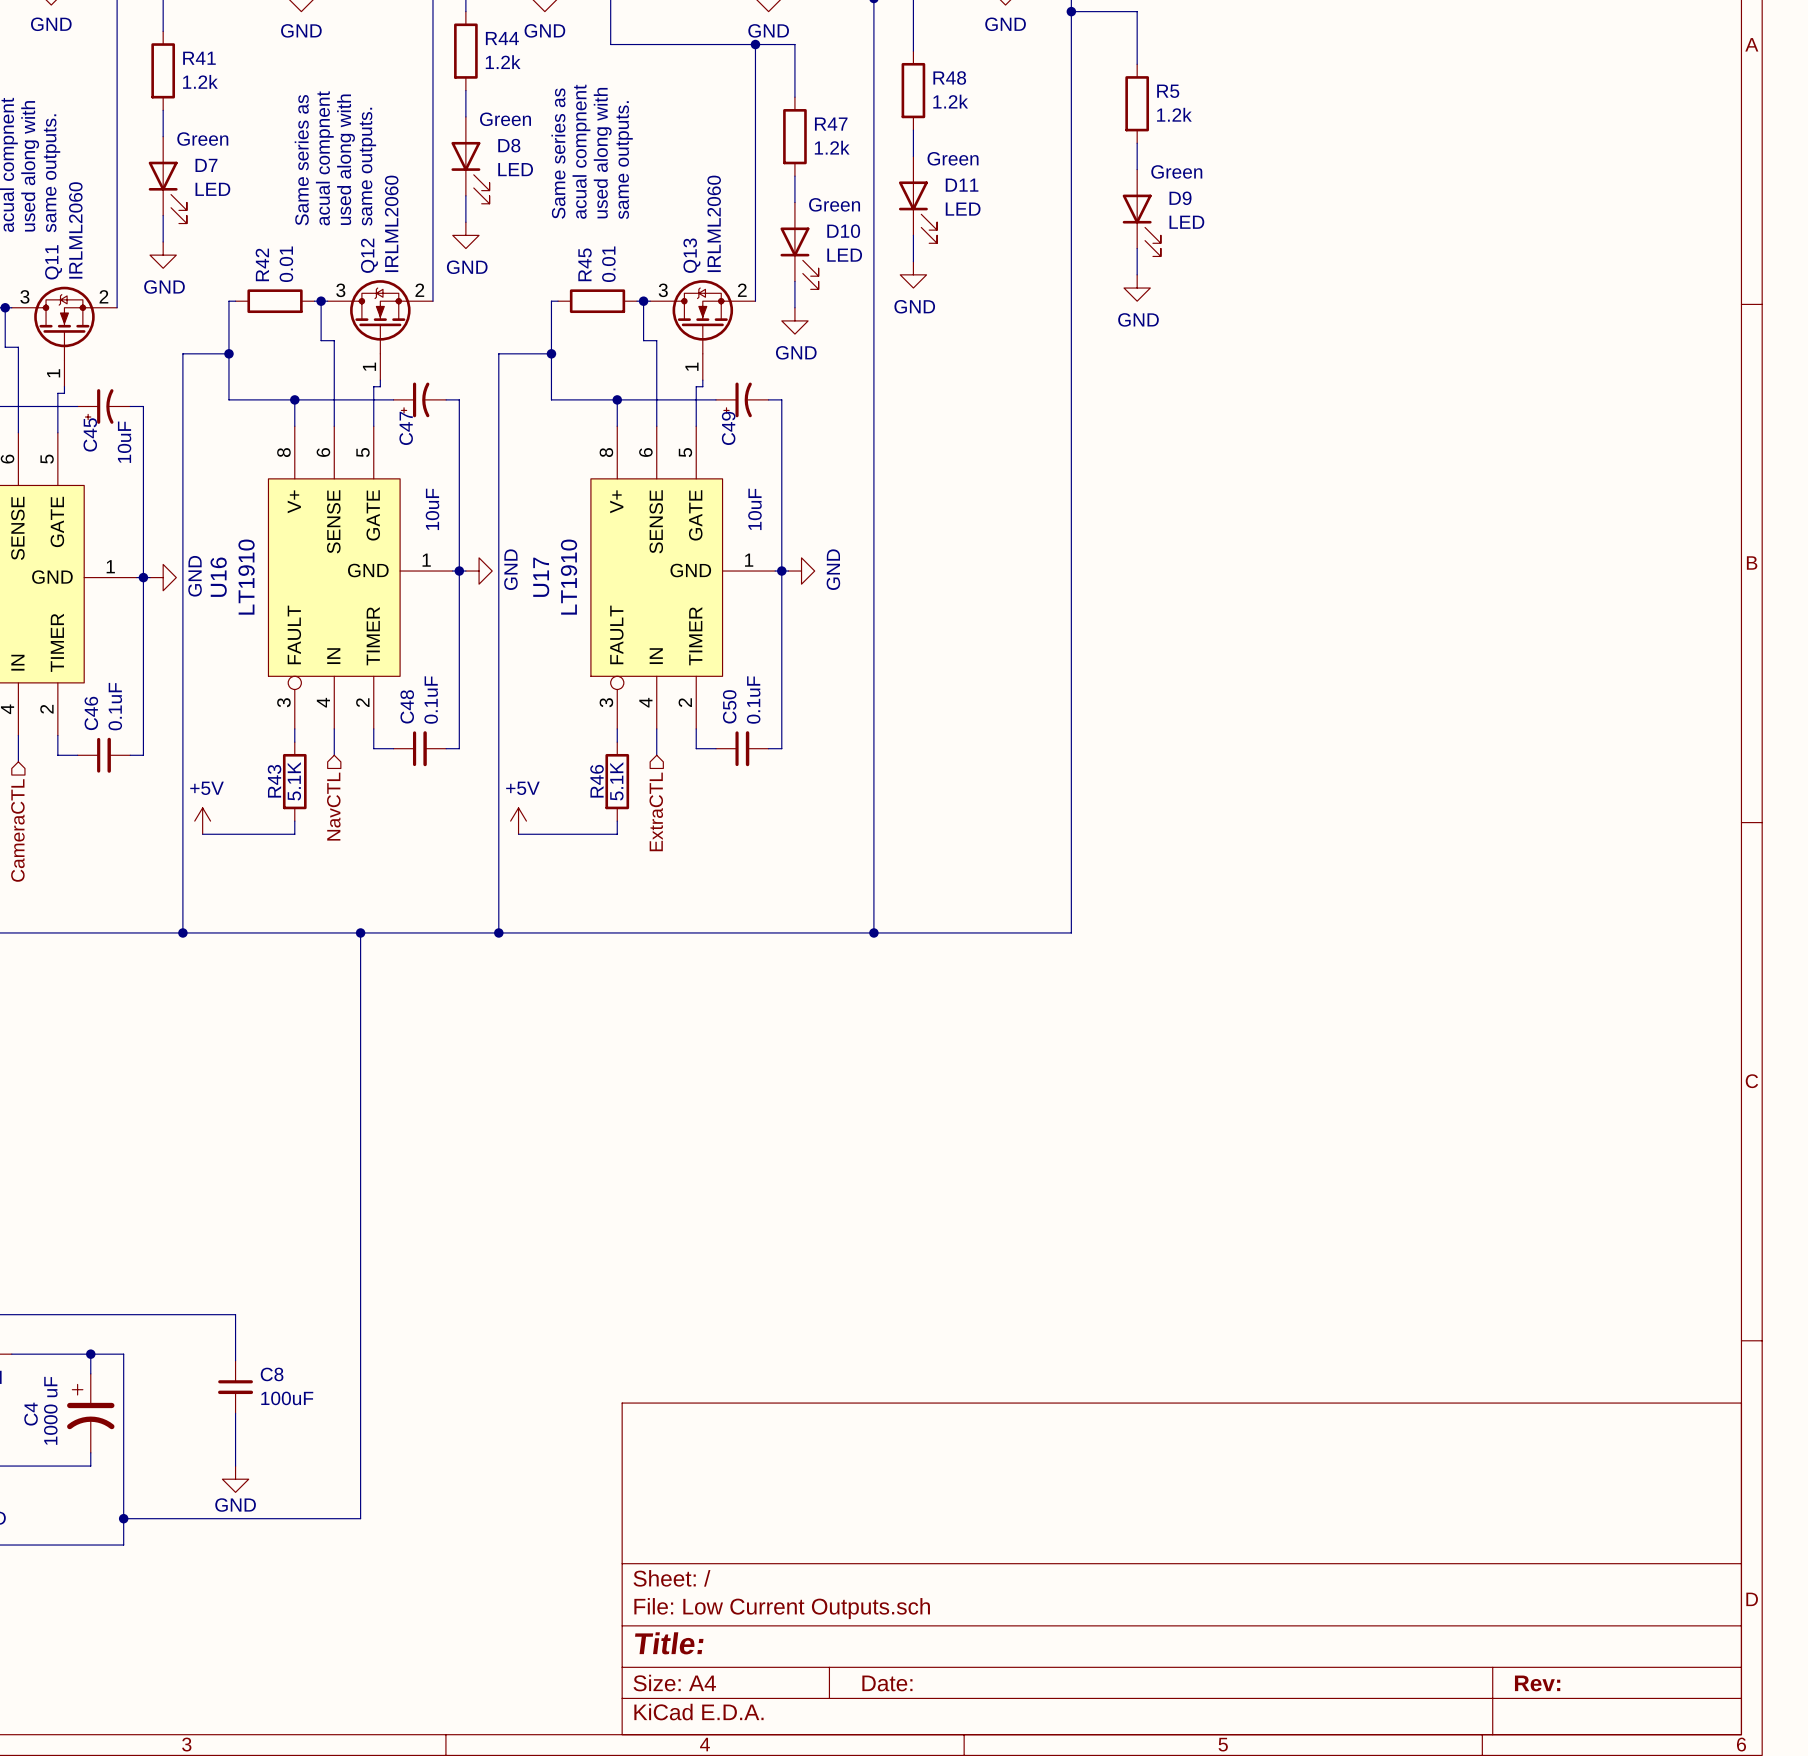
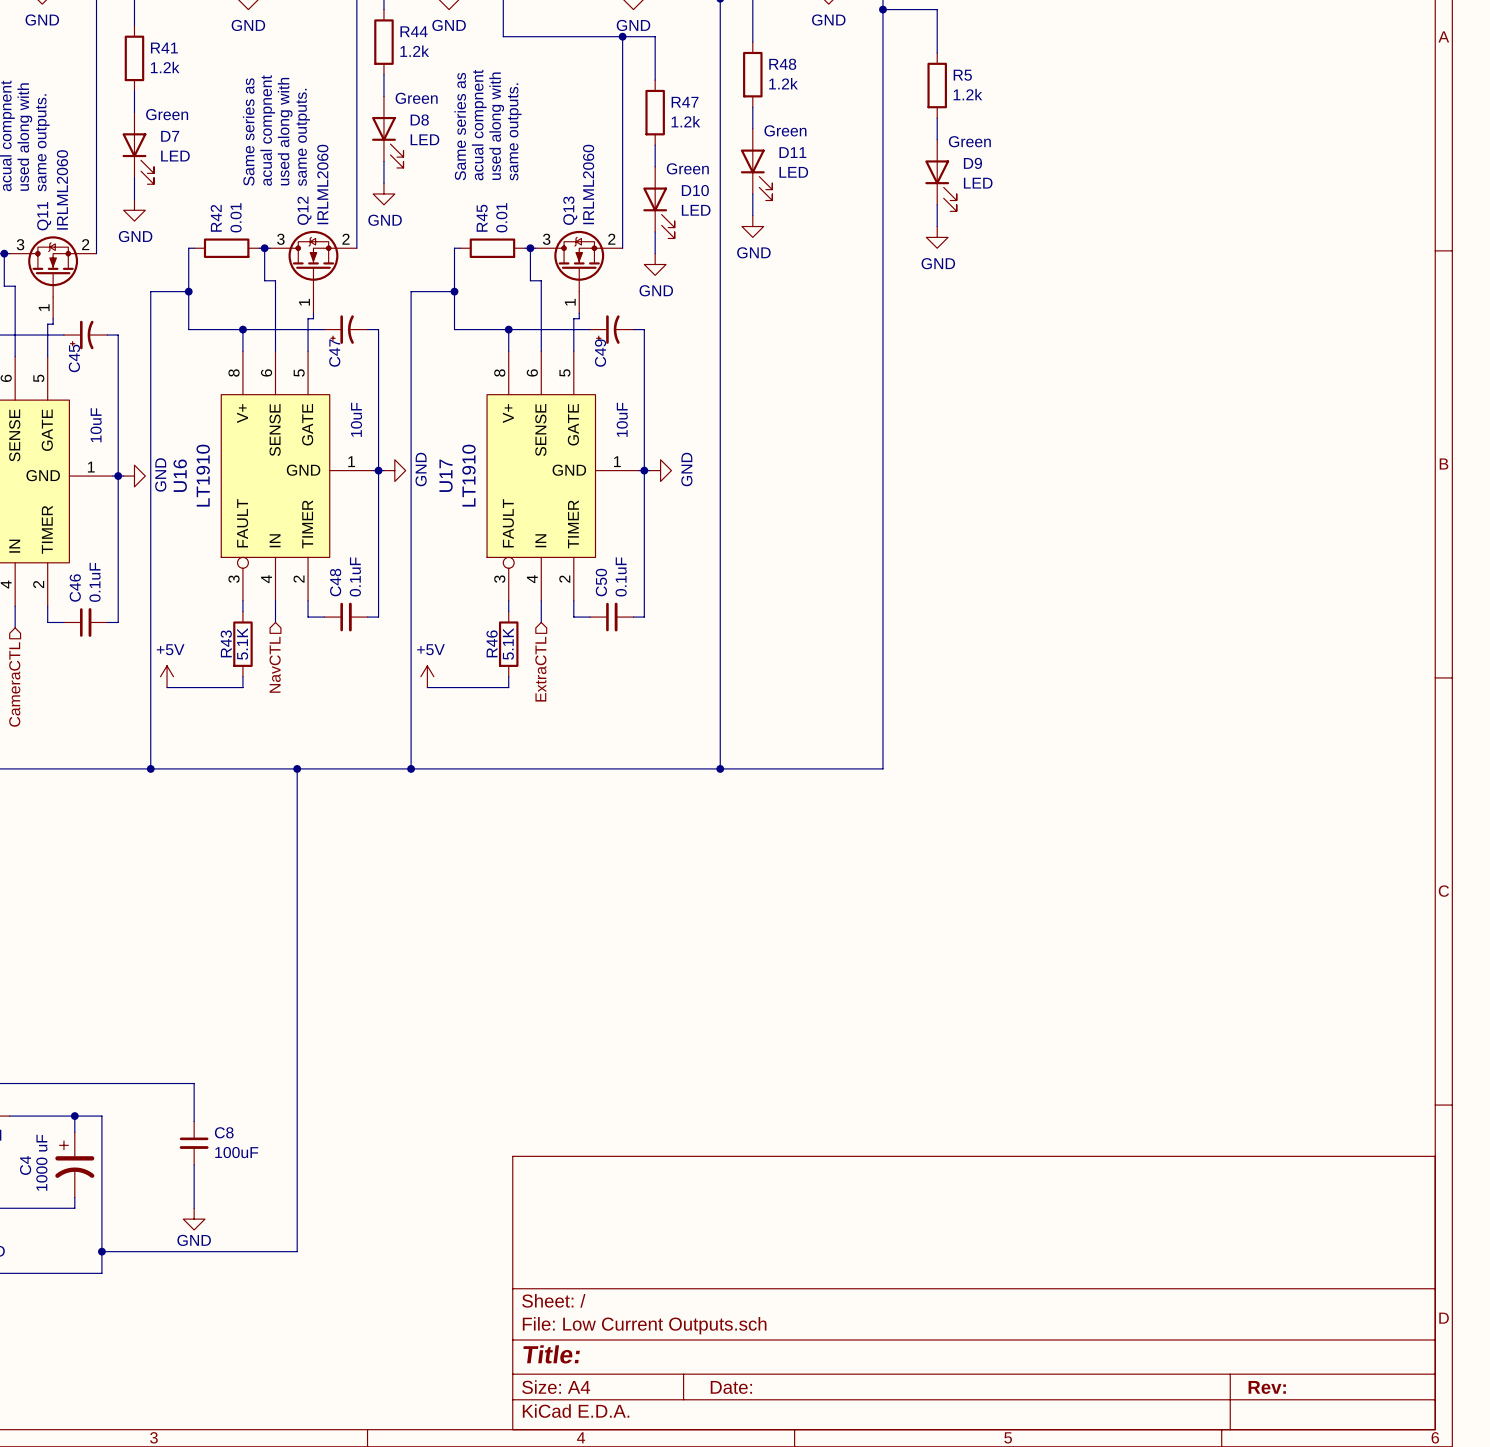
C45 value position: 10uF (124, 442) -> 10uF (96, 425)

